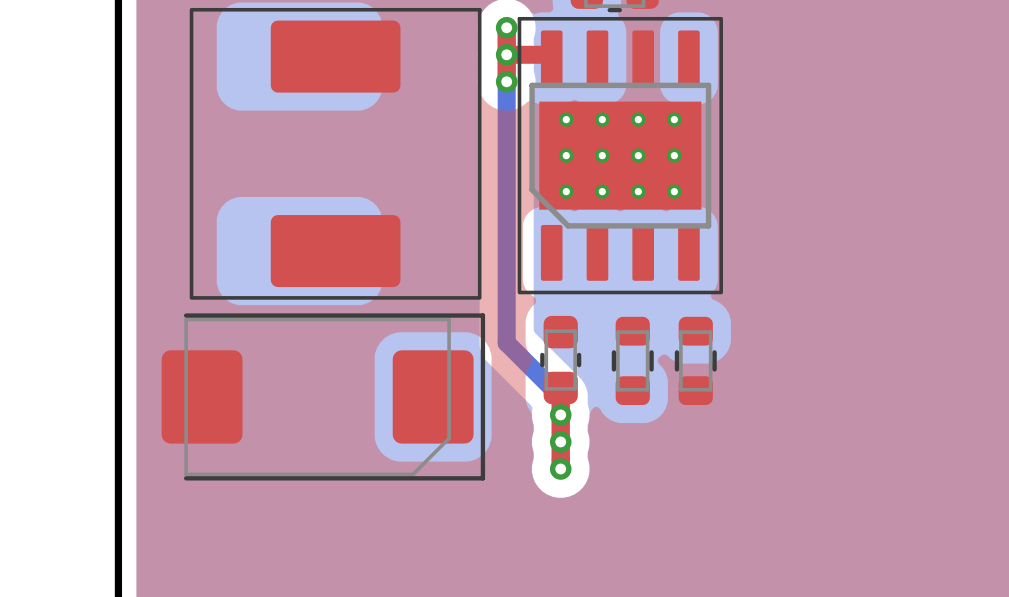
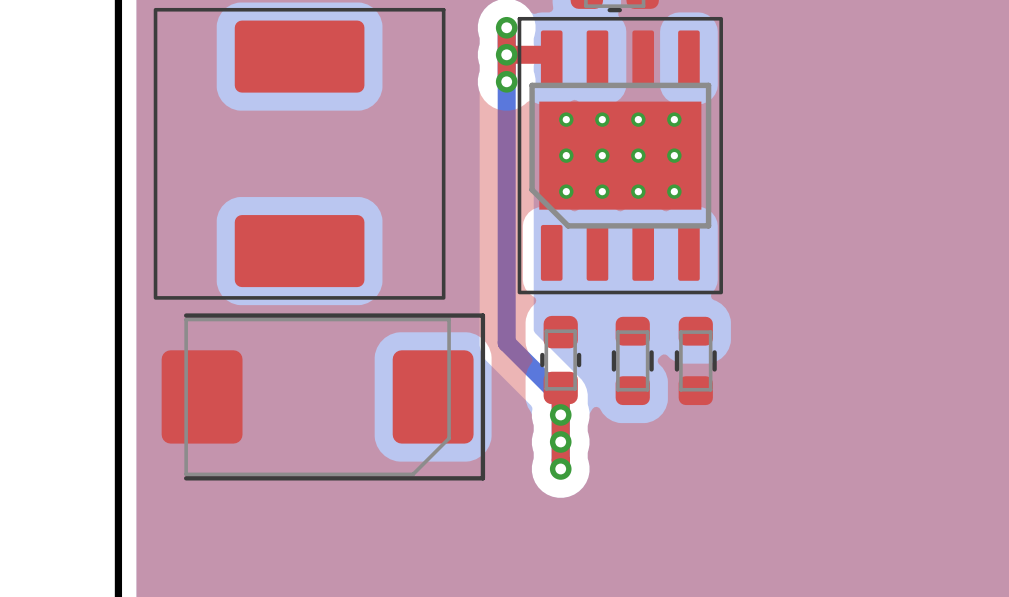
part position: (335, 153) -> (299, 153)

